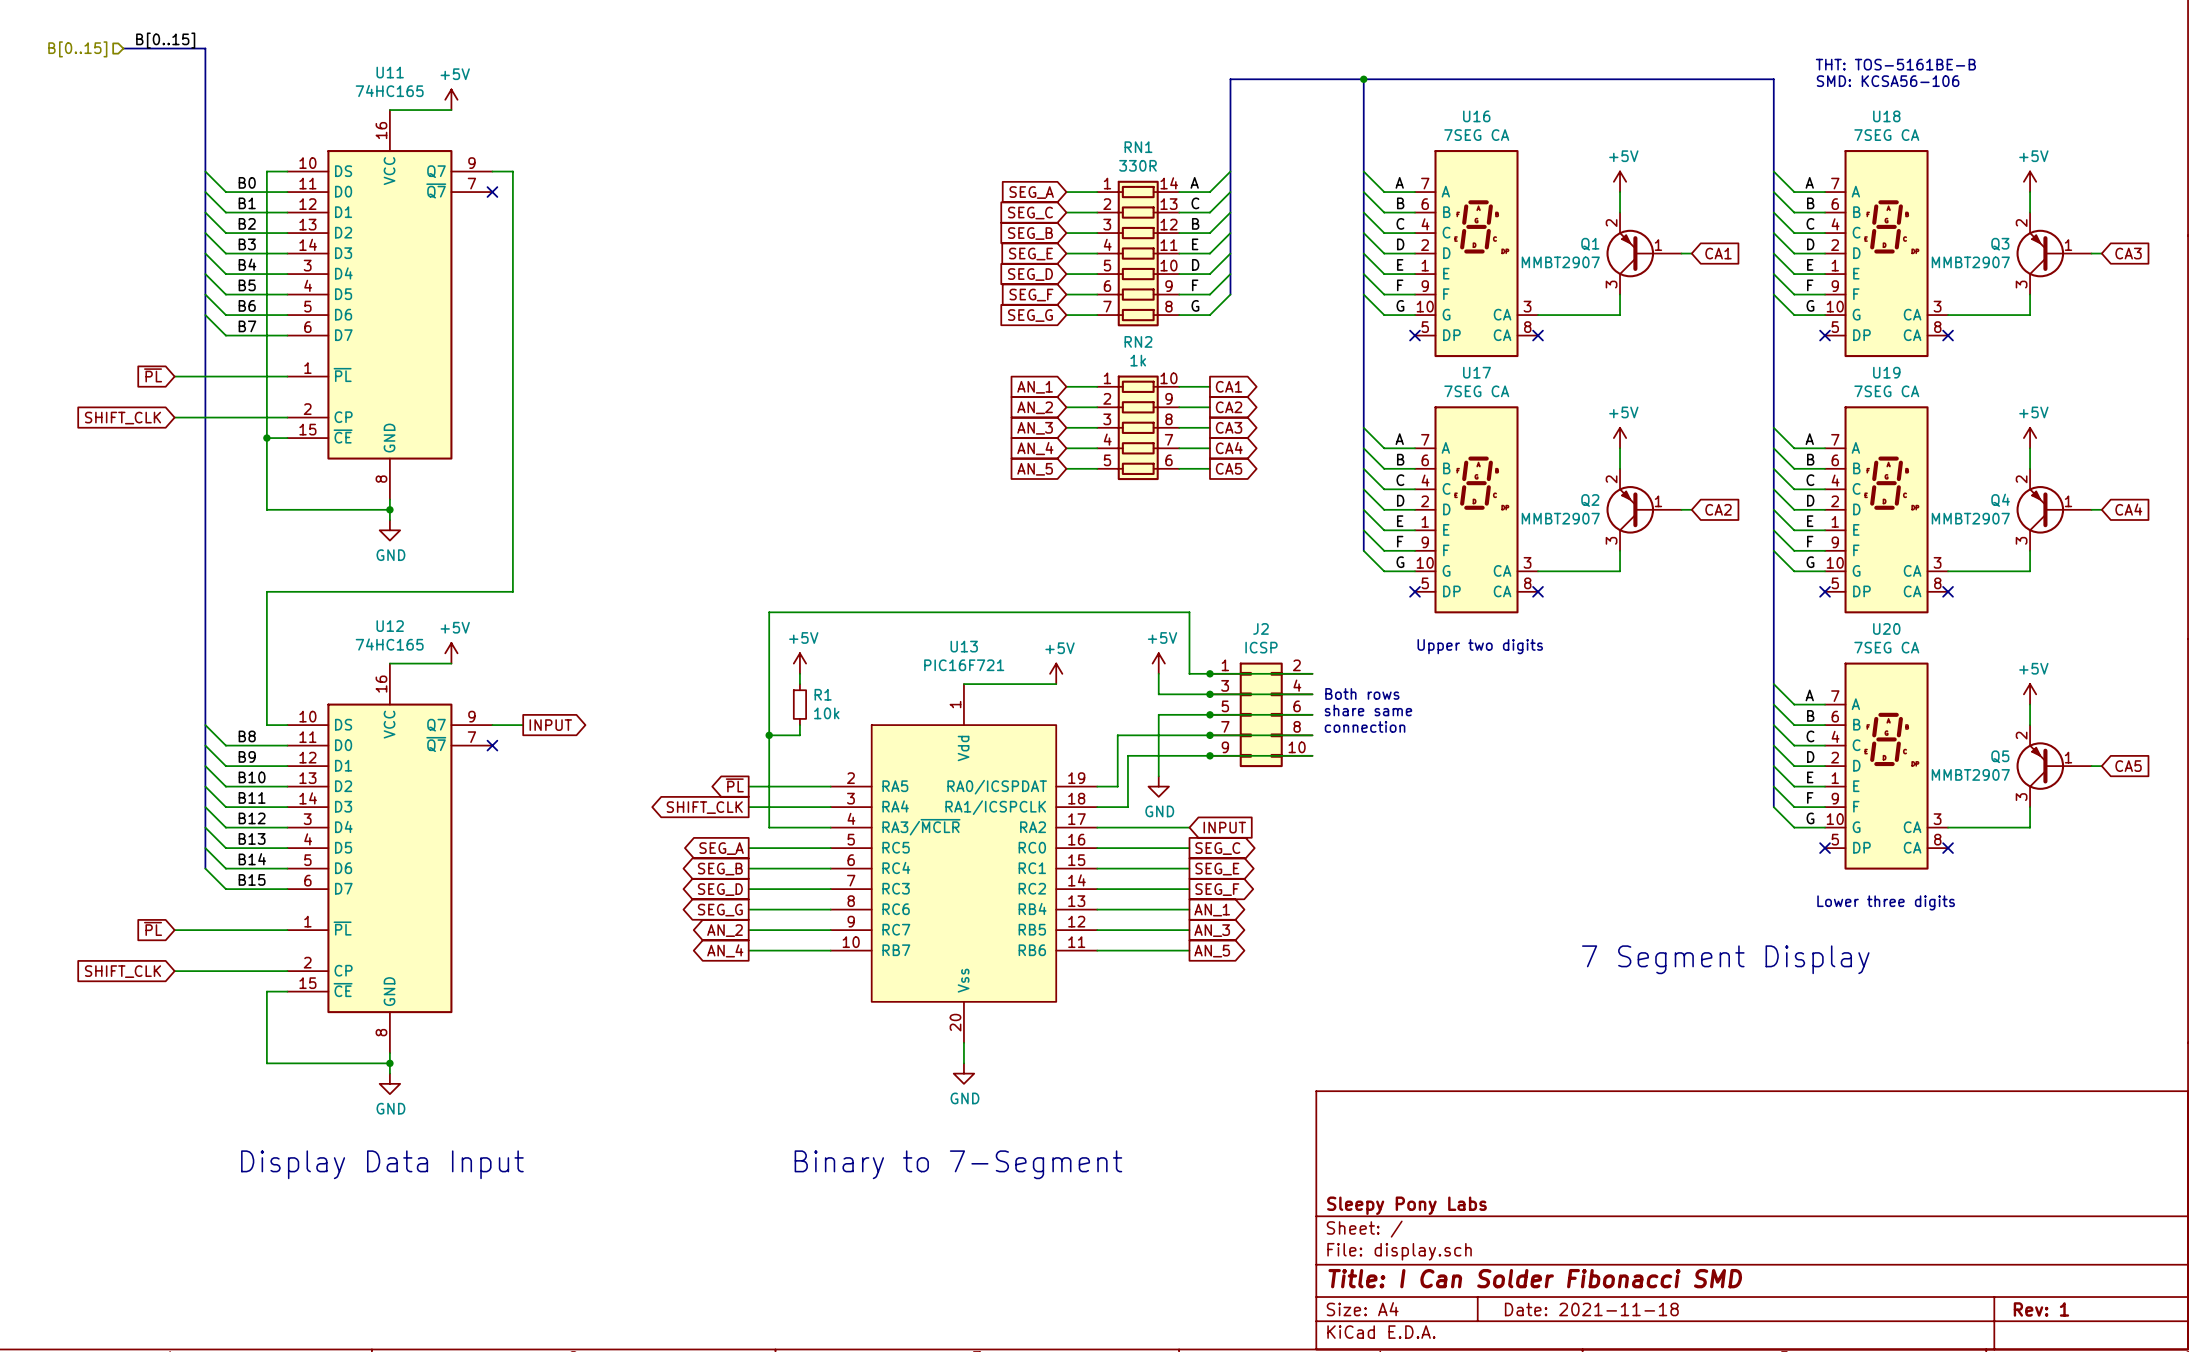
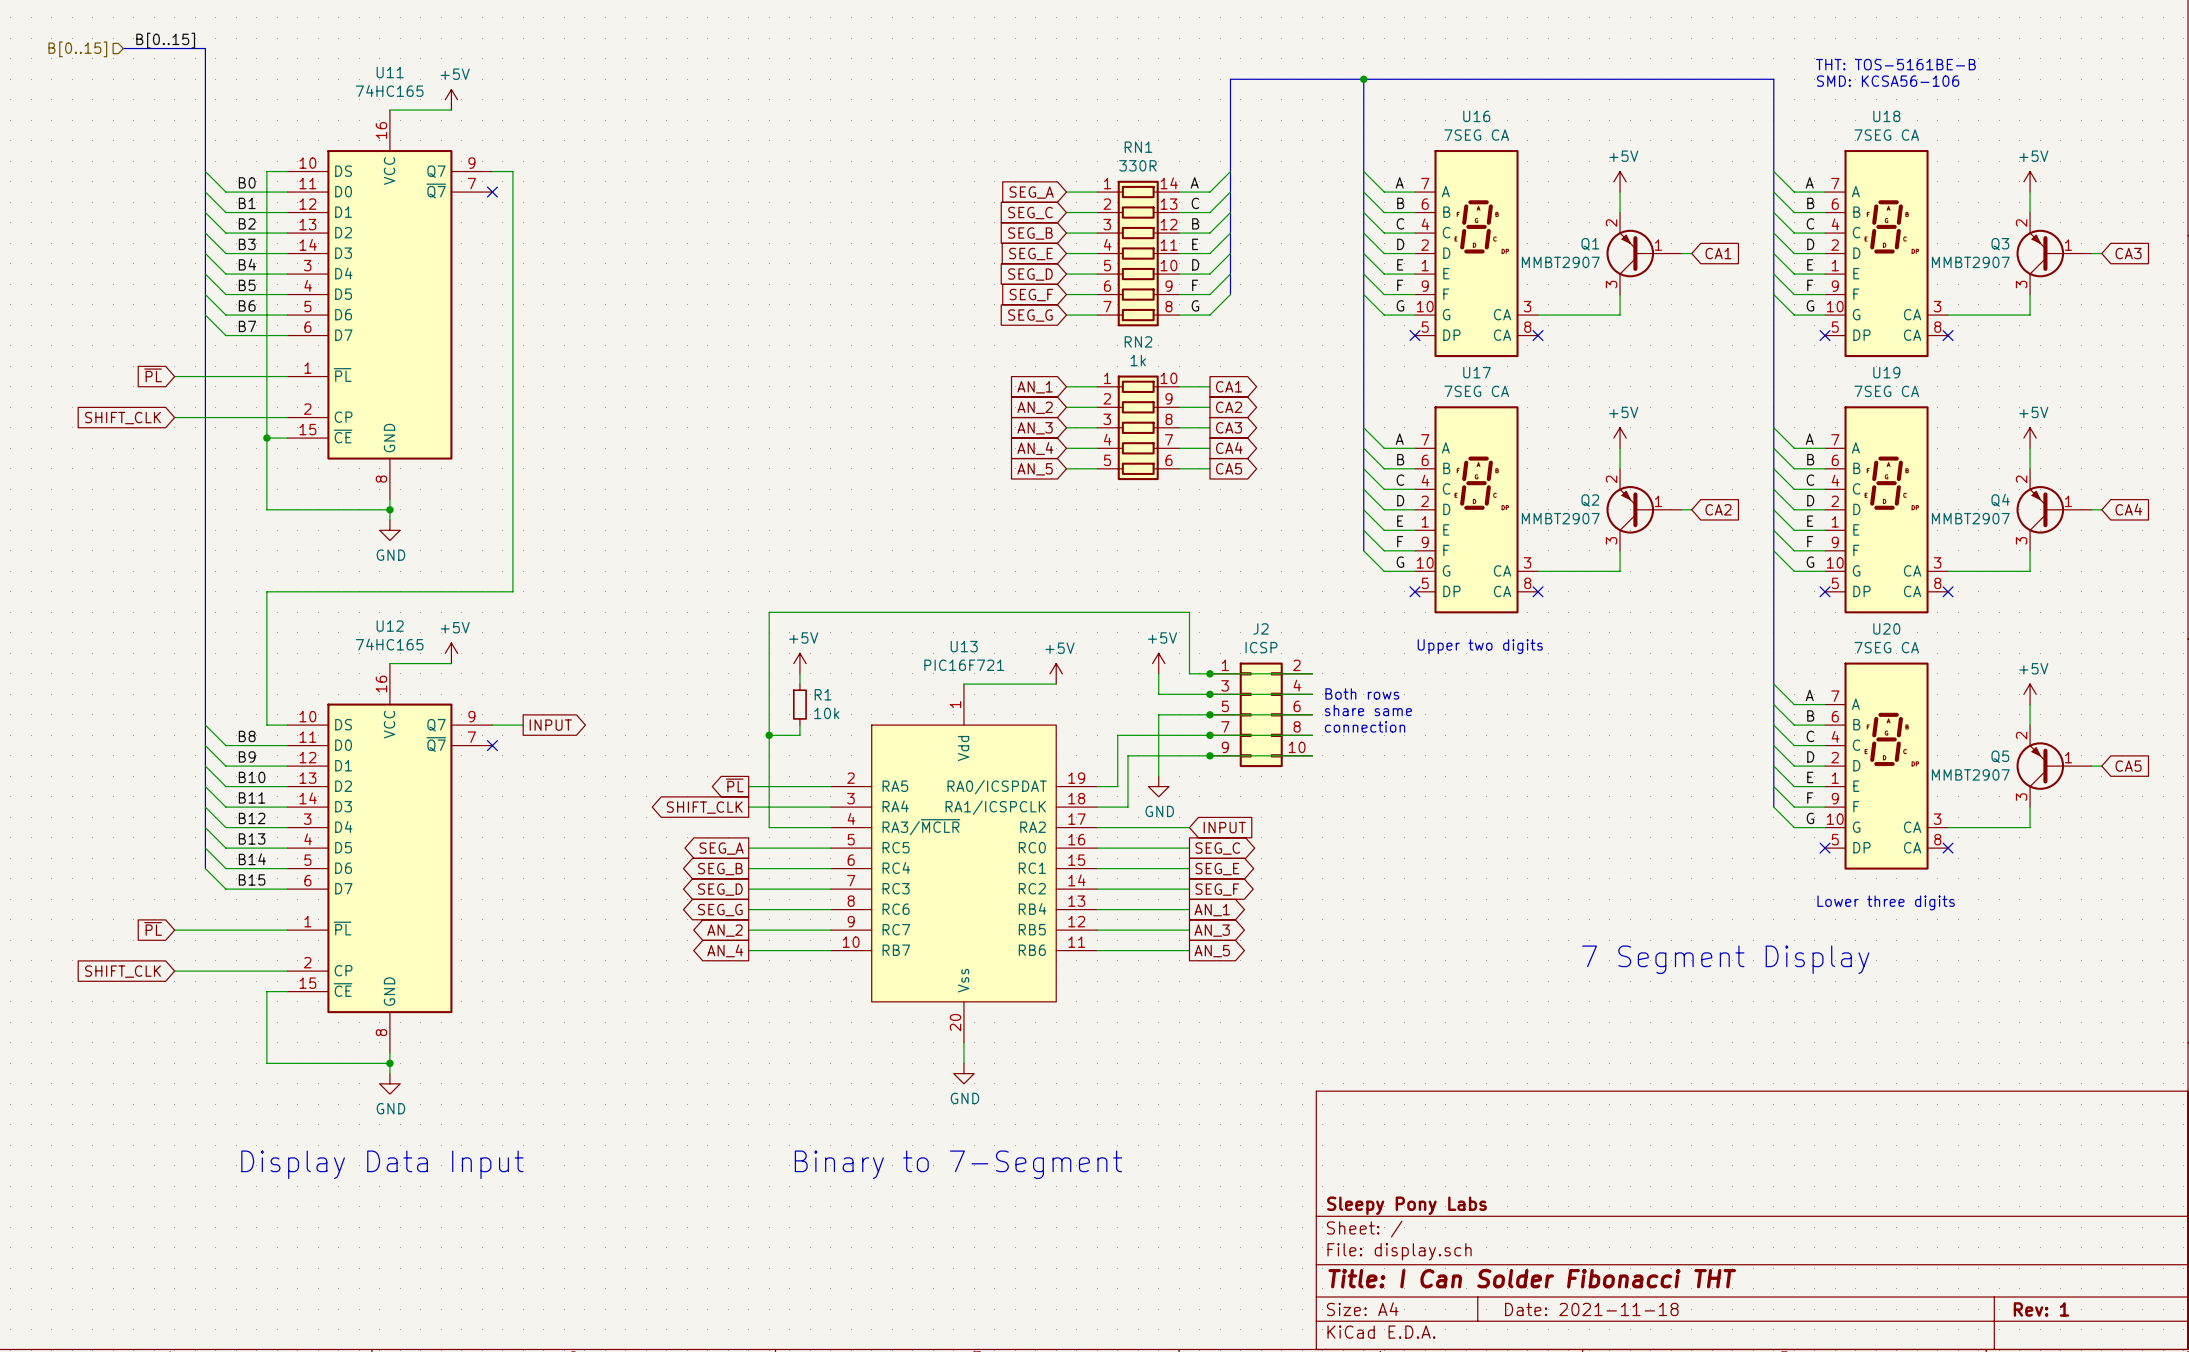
title block: Title: I Can Solder Fibonacci SMD (1535, 1278) -> Title: I Can Solder Fibonacci THT (1532, 1278)

